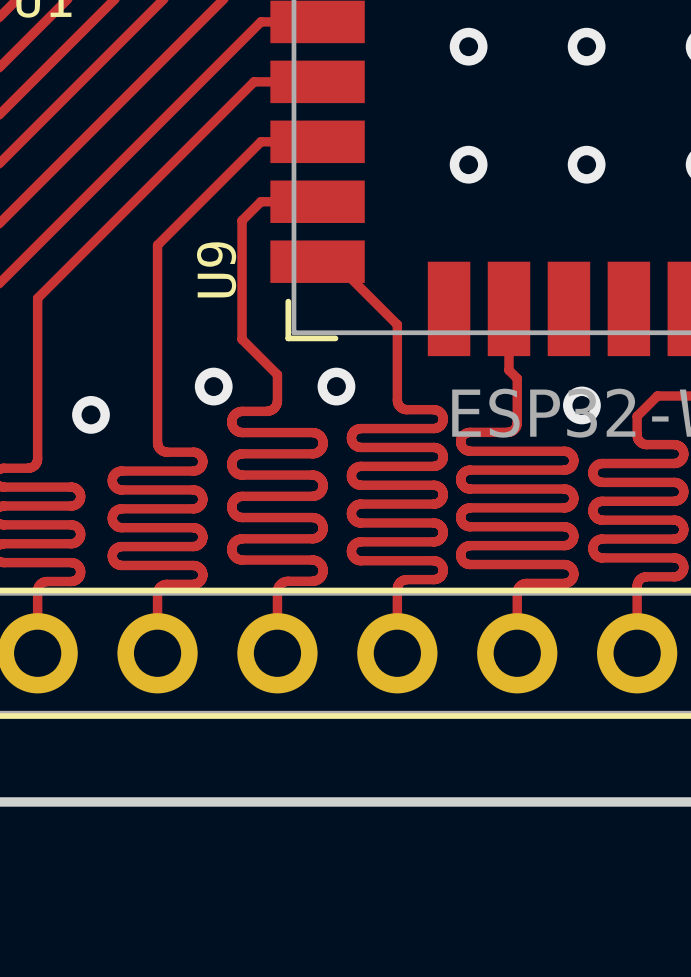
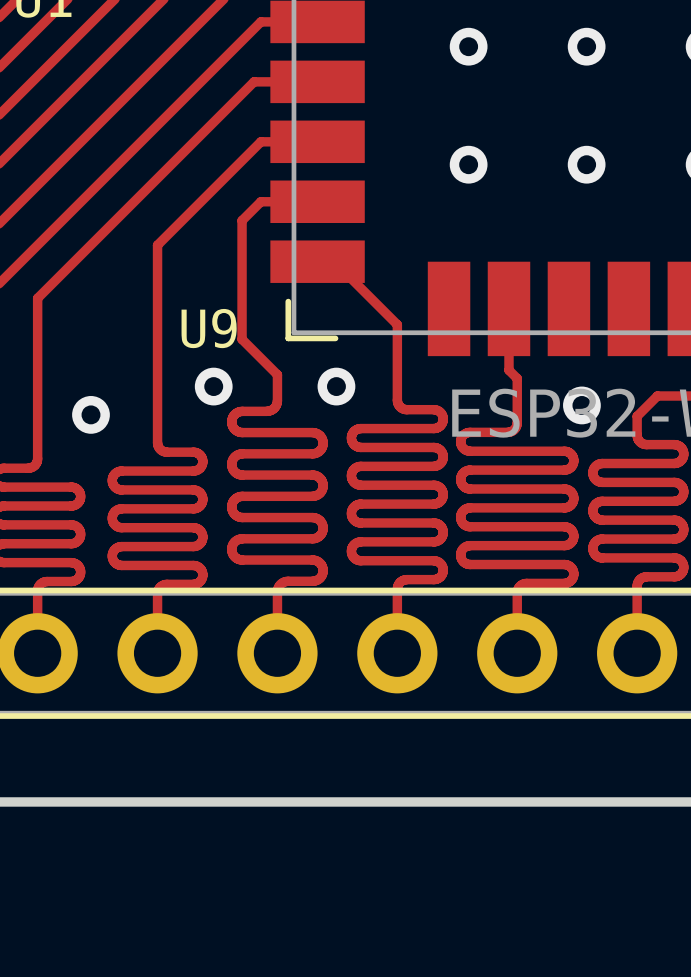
U9 name rotation: 0° (216, 269) -> 90° clockwise (209, 328)

